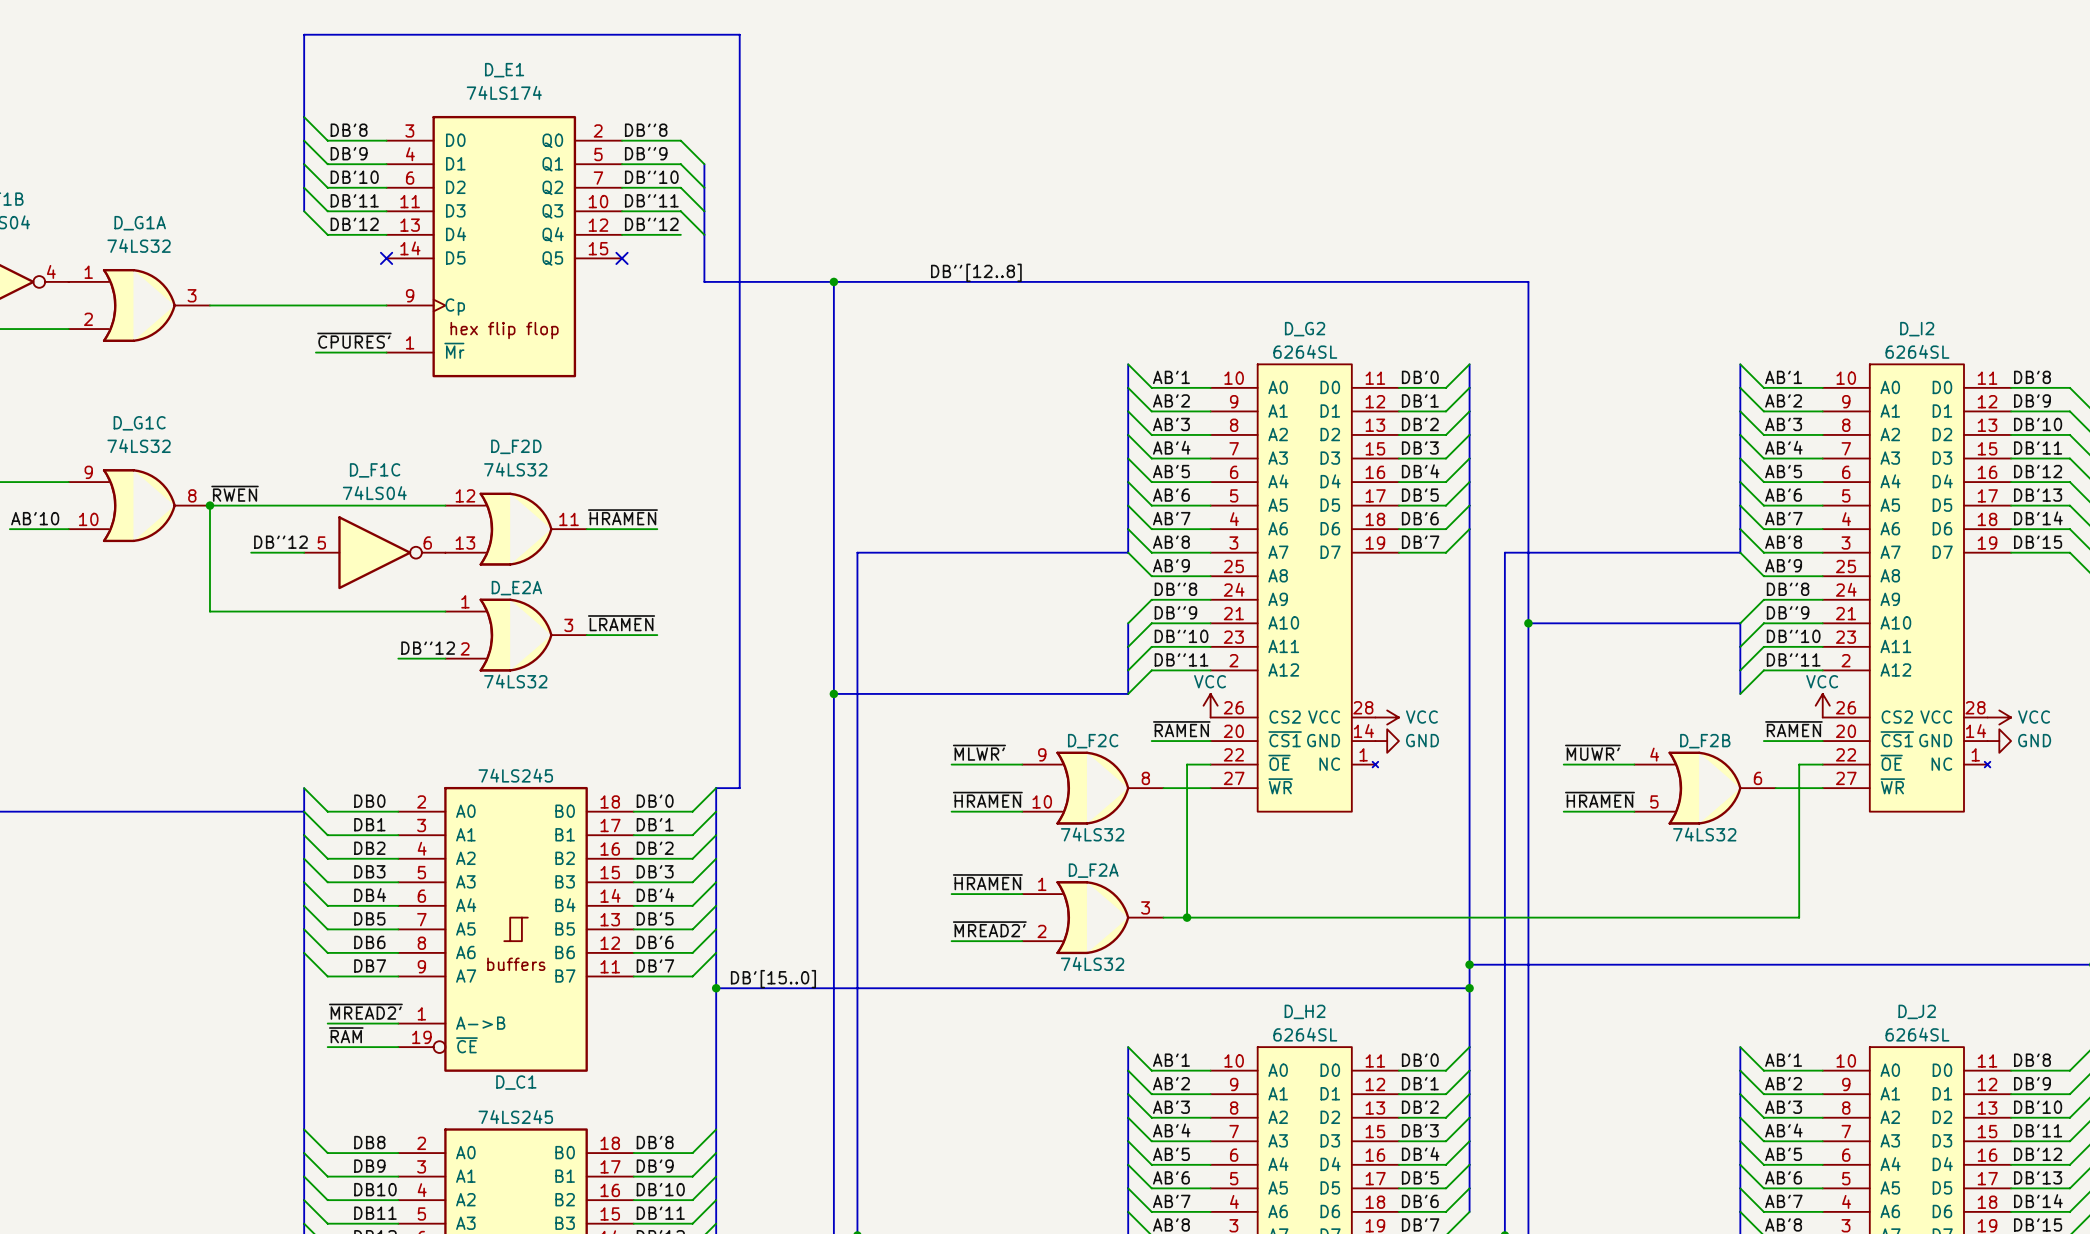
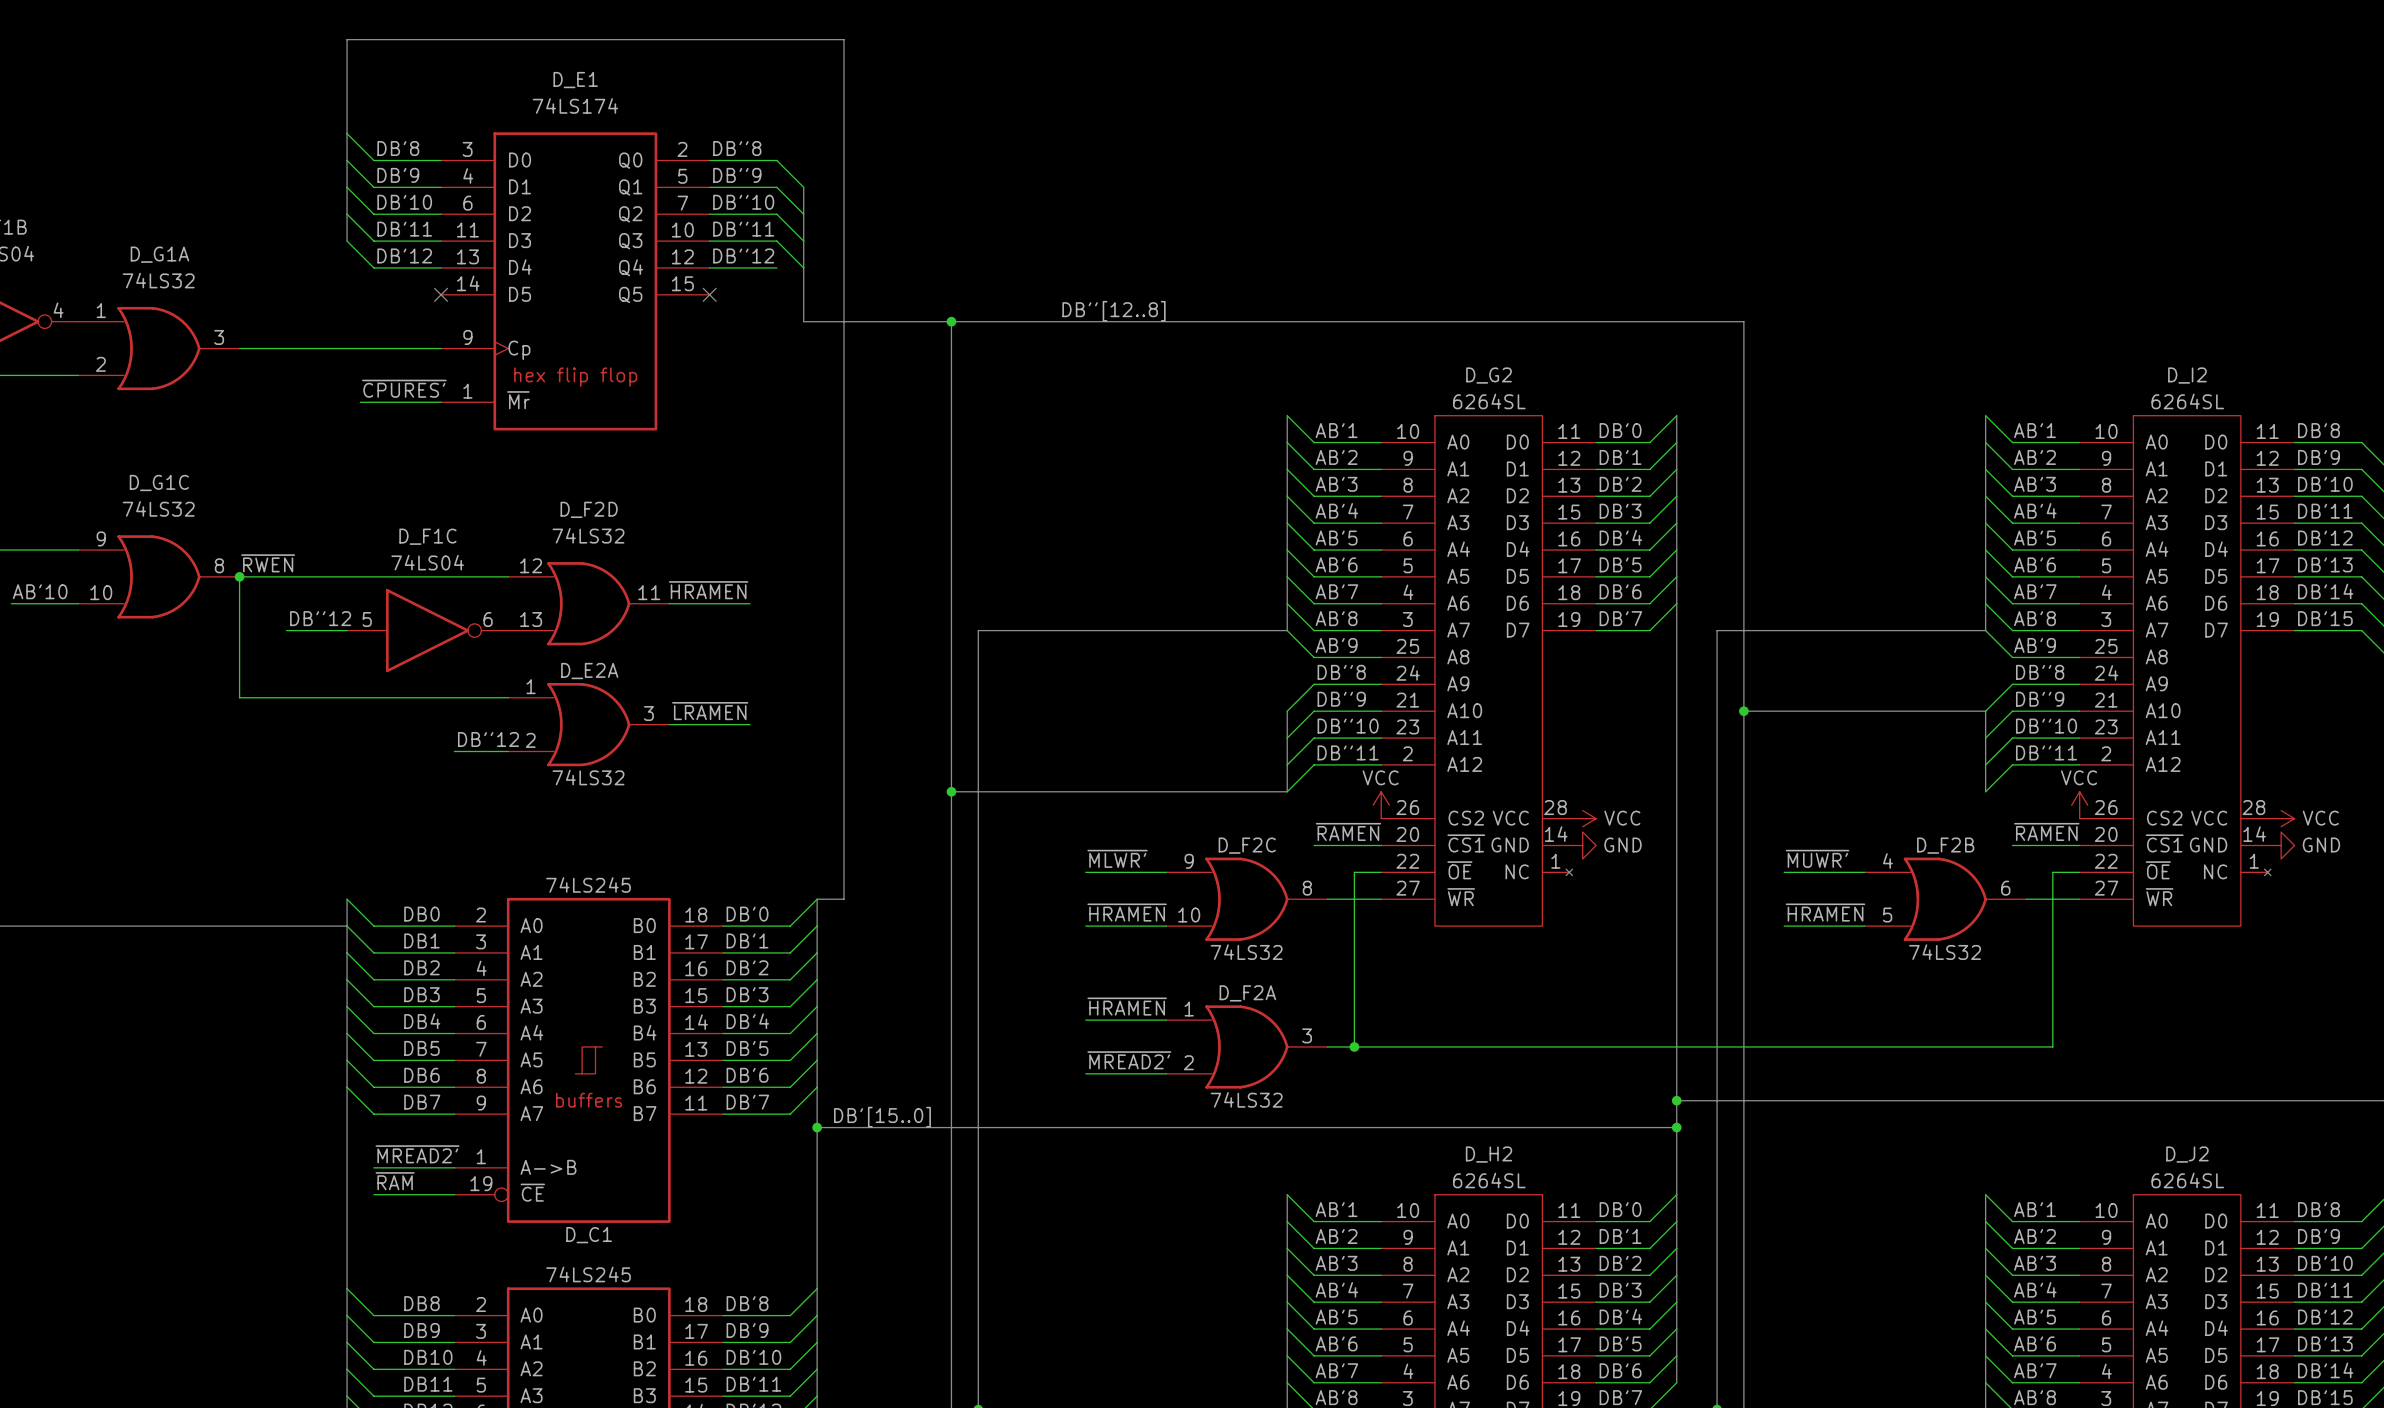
label position: ~{HRAMEN} (622, 517) -> ~{HRAMEN} (708, 590)
label position: ~{LRAMEN} (621, 623) -> ~{LRAMEN} (710, 711)

